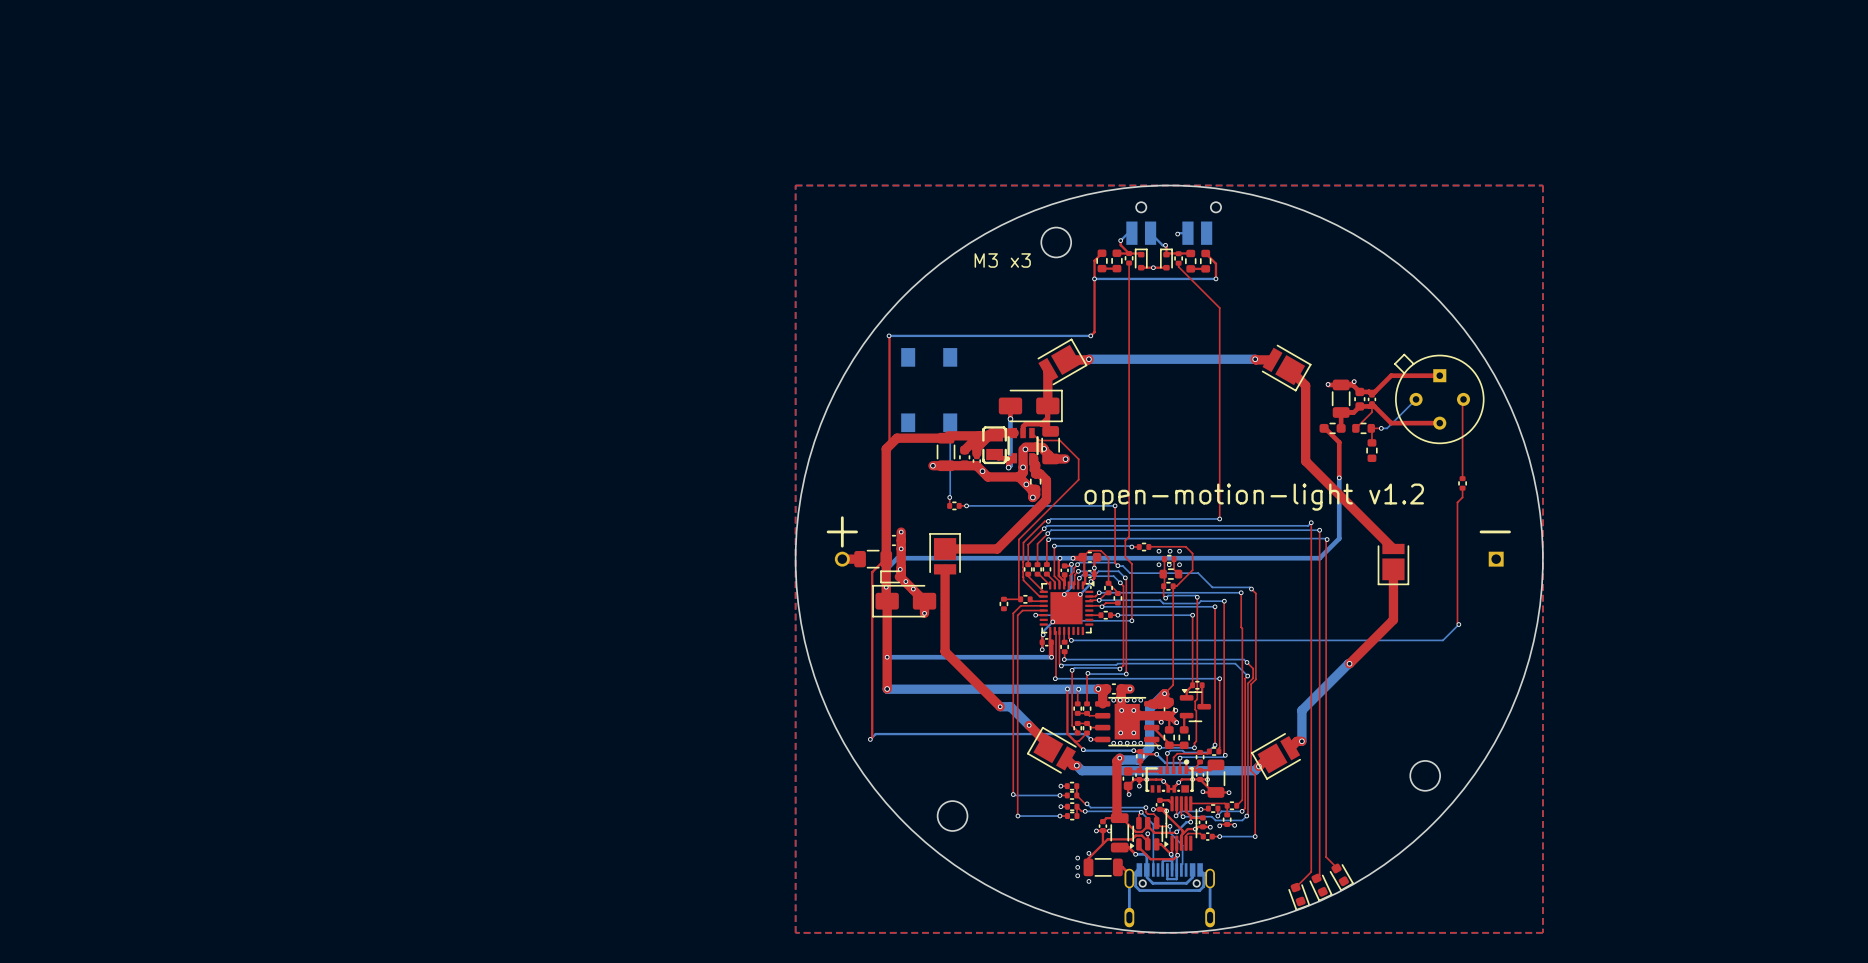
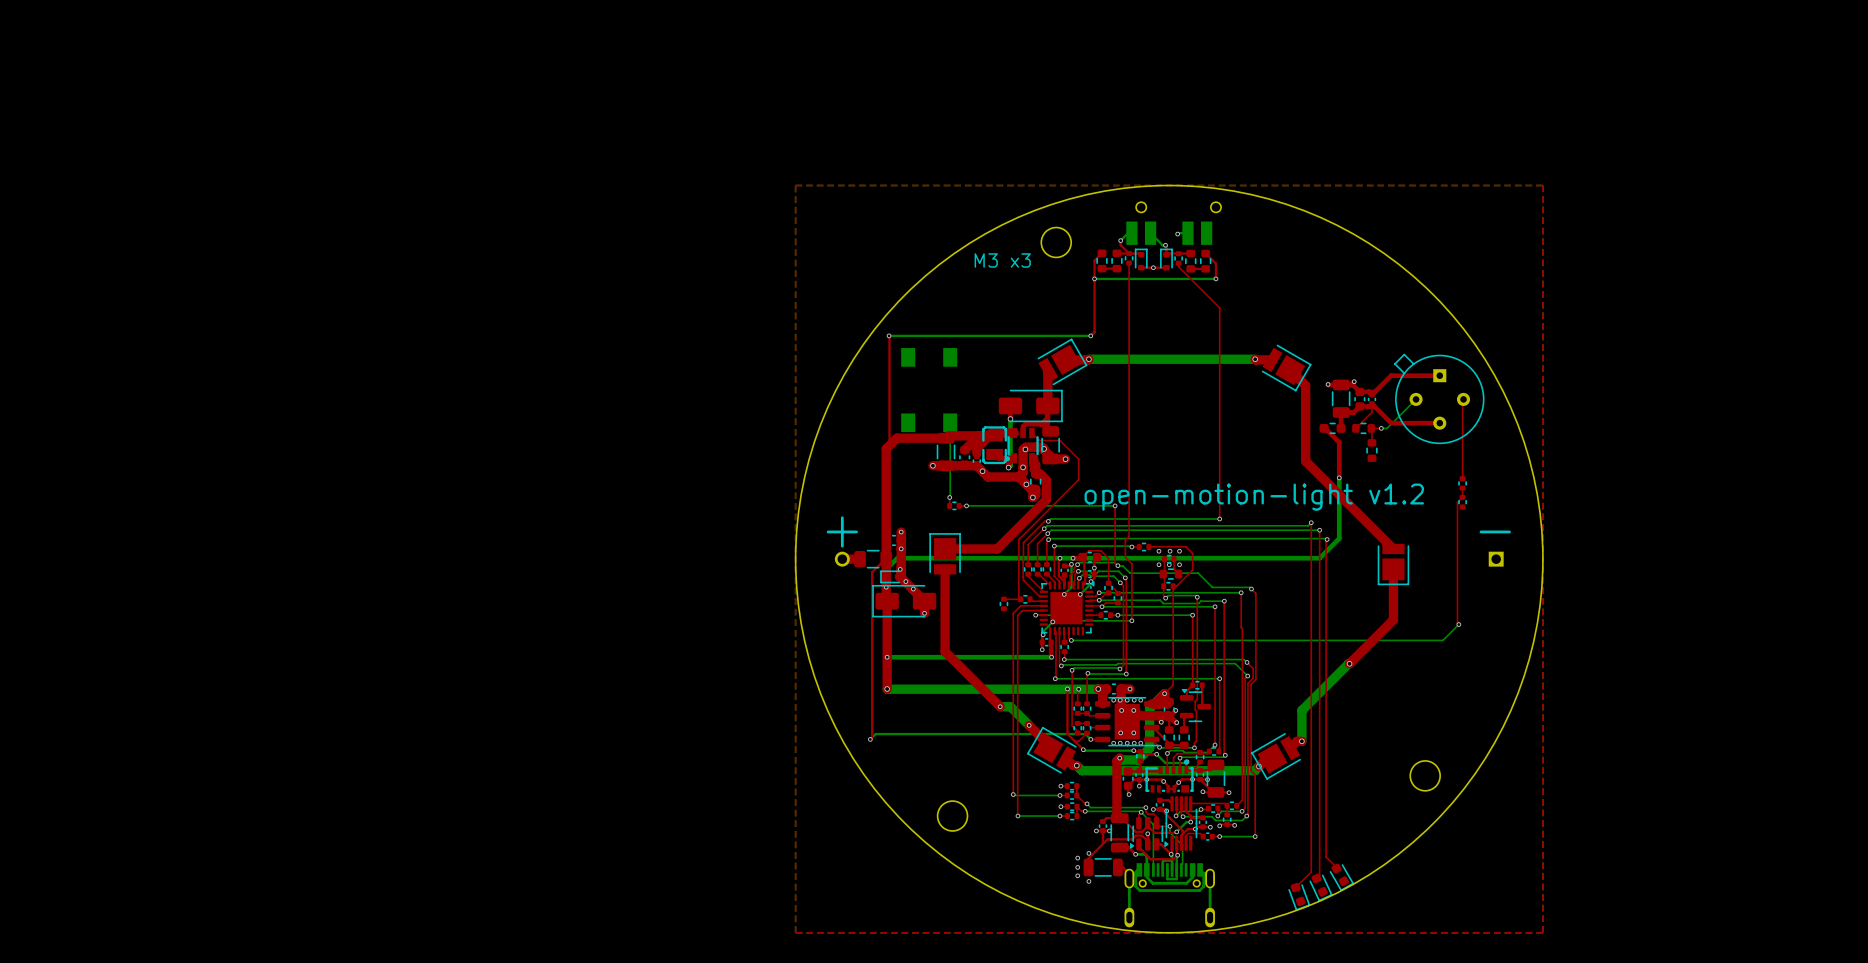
part: none -> (1462, 502)

